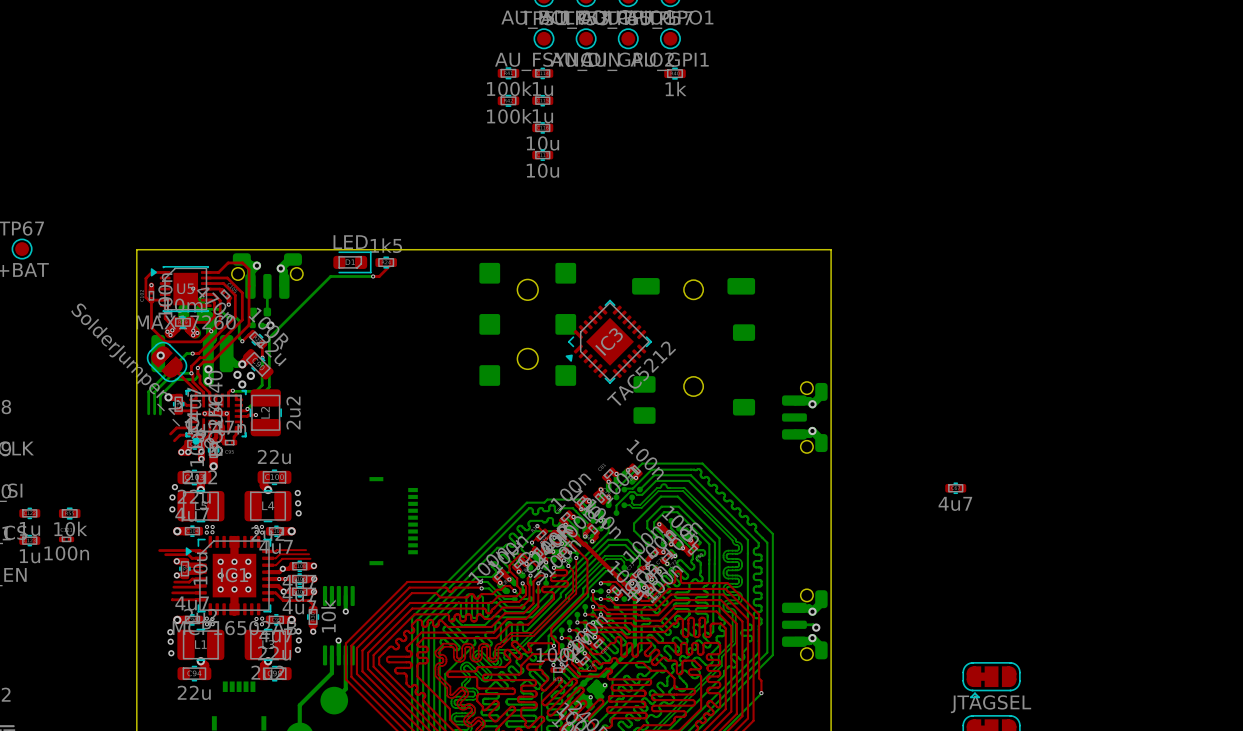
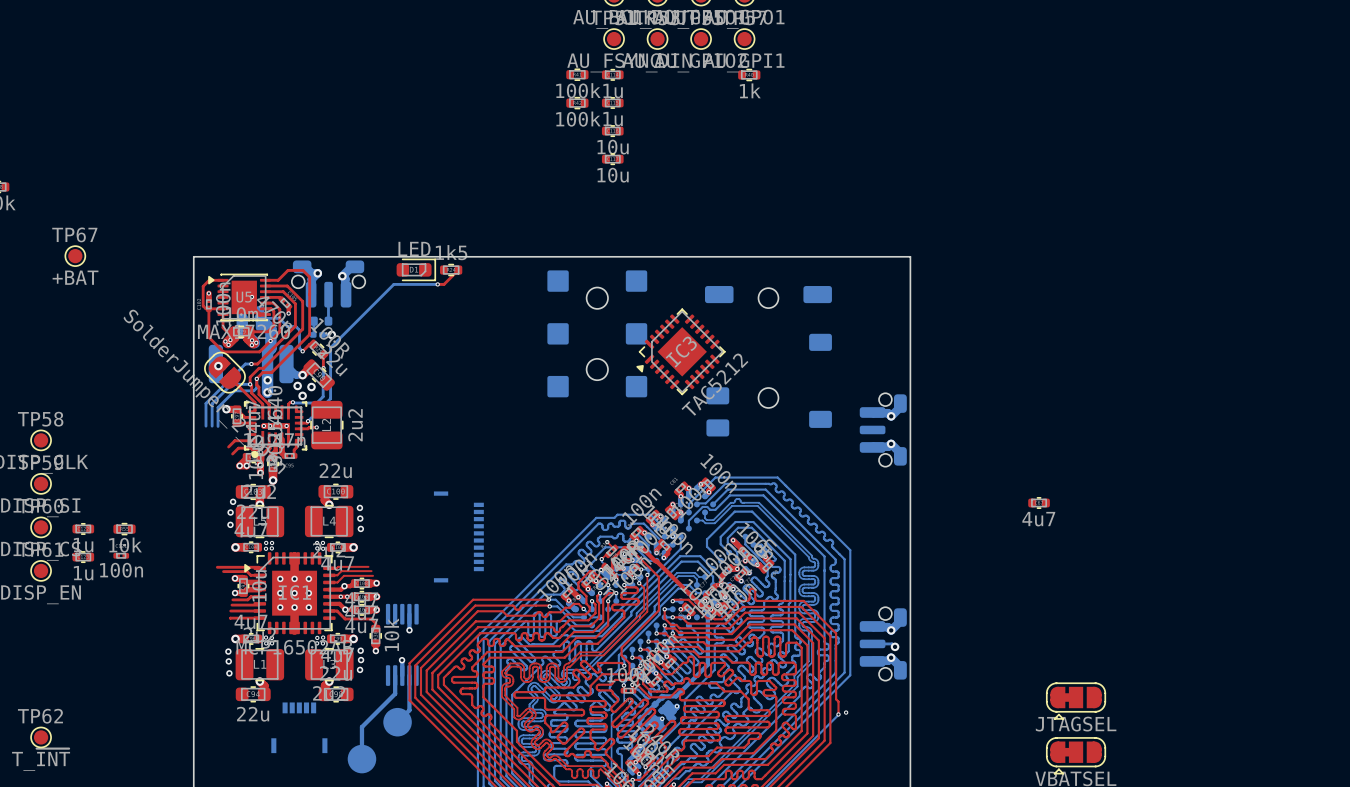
via: none -> (846, 712)

